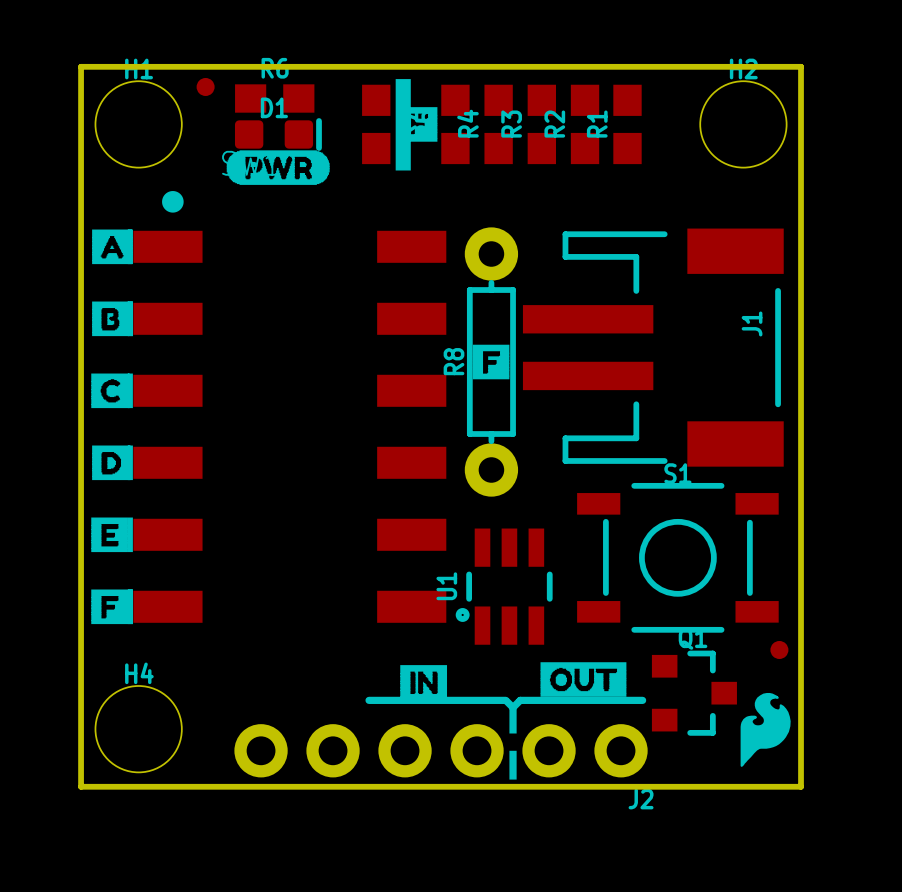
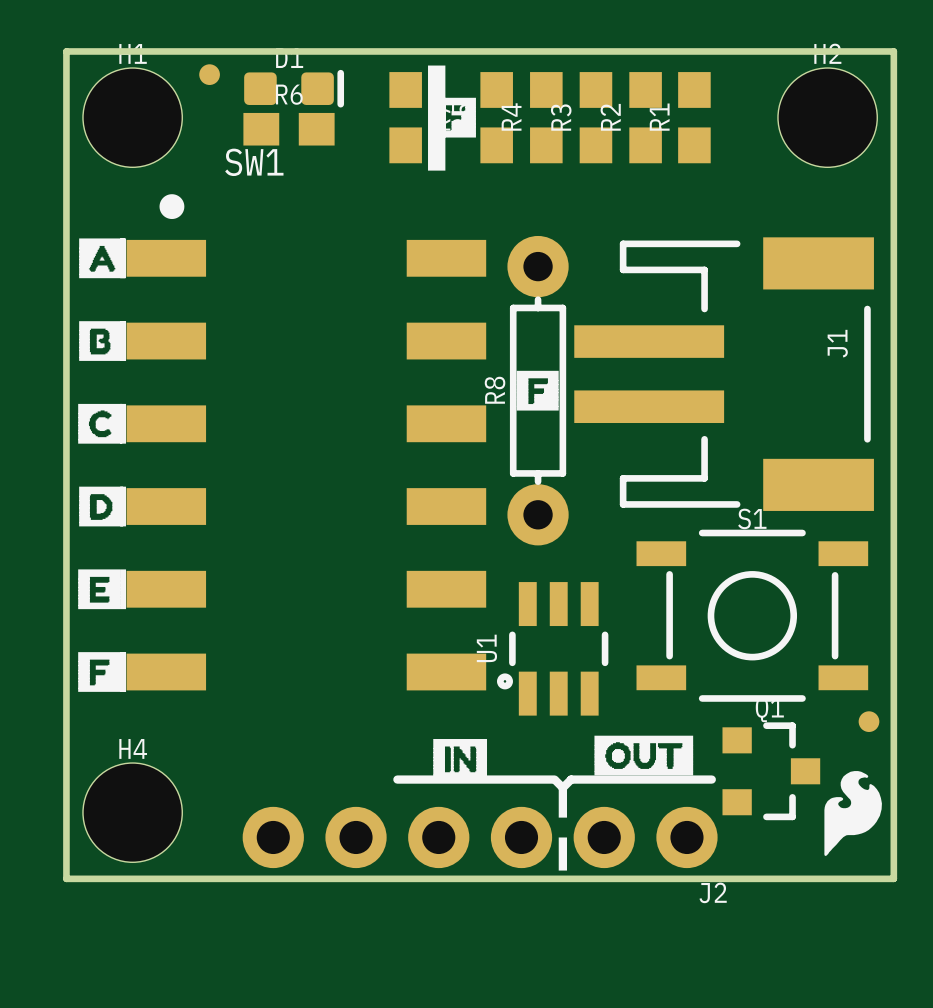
R6 position: (274, 98) -> (289, 129)
D1 position: (278, 134) -> (294, 88)
drawing: [226, 150, 330, 185] -> none

